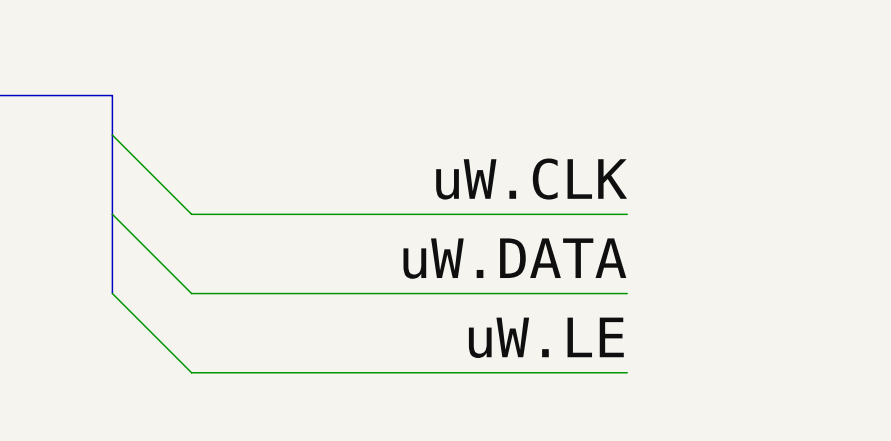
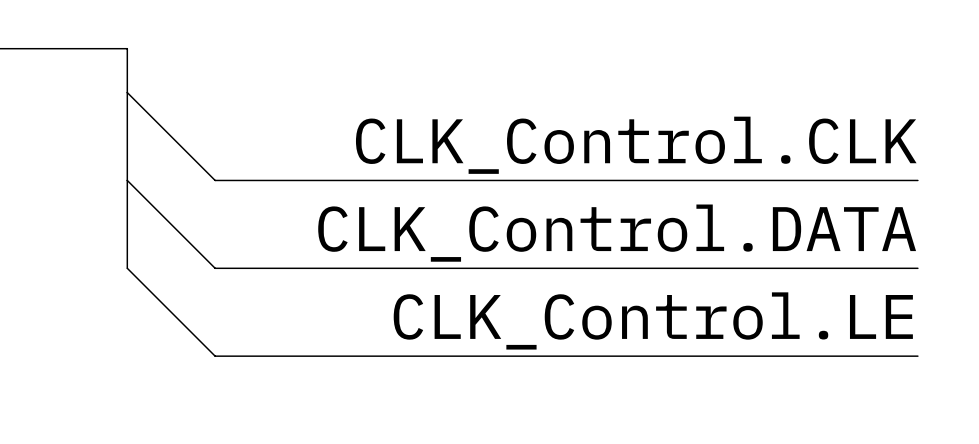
label: uW.CLK (531, 179) -> none
label: none -> CLK_Control.CLK (636, 145)
wire: none -> (698, 180) (917, 180)
label: uW.DATA (514, 258) -> none
label: none -> CLK_Control.DATA (617, 233)
wire: none -> (698, 268) (917, 268)
label: uW.LE (546, 337) -> none
label: none -> CLK_Control.LE (653, 320)
wire: none -> (698, 356) (917, 356)

